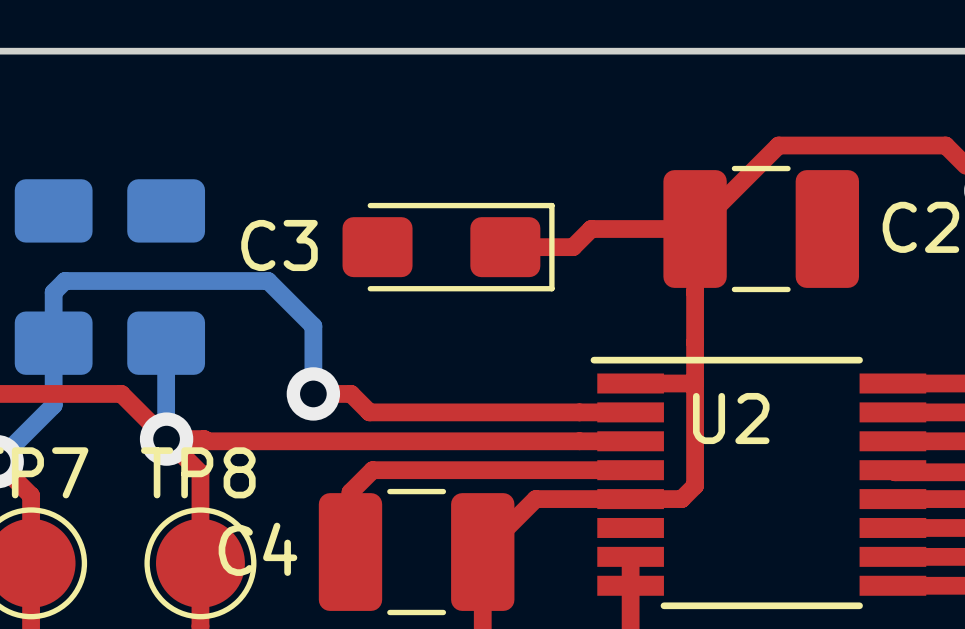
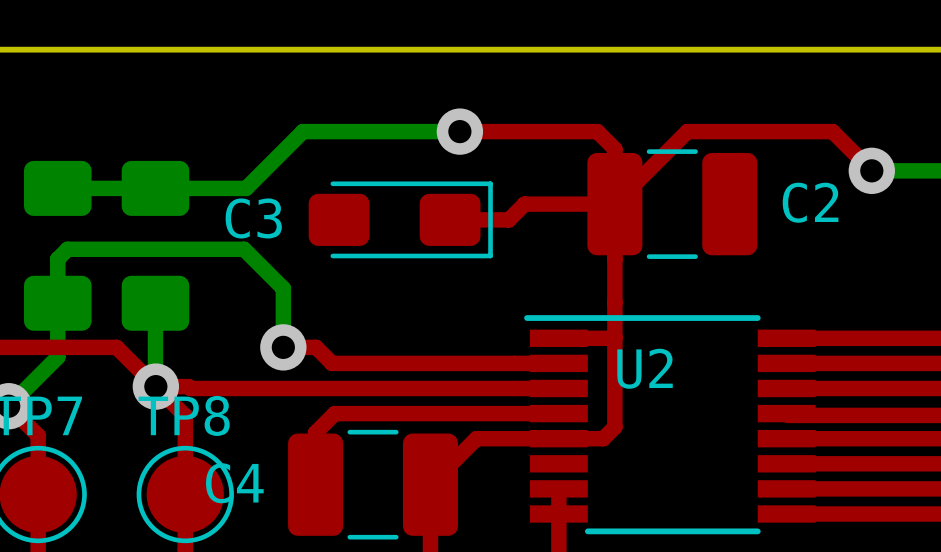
top track: none -> (459, 131) (597, 131) (614, 149) (614, 204)
bottom track: none -> (459, 131) (302, 131) (246, 188) (57, 188)
via: none -> (459, 131)

